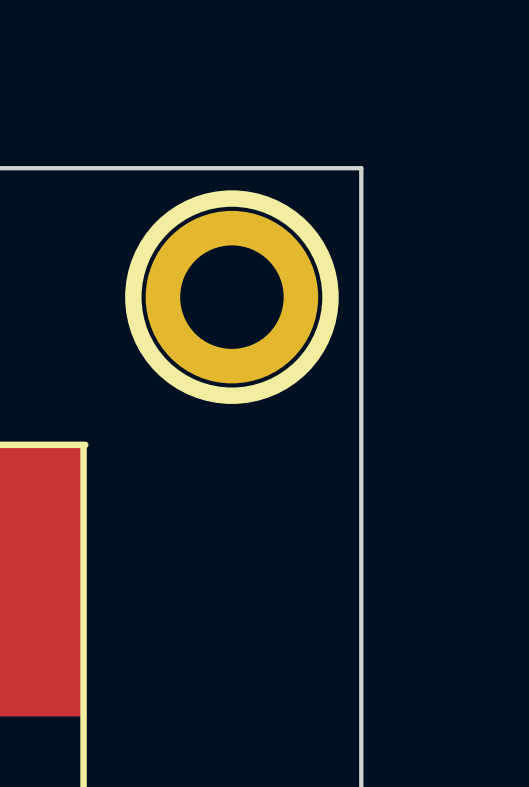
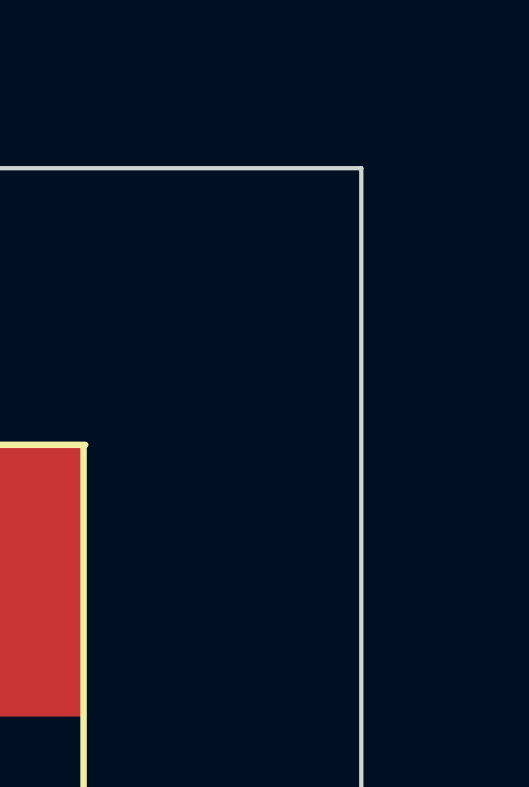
part: (231, 297) -> none

